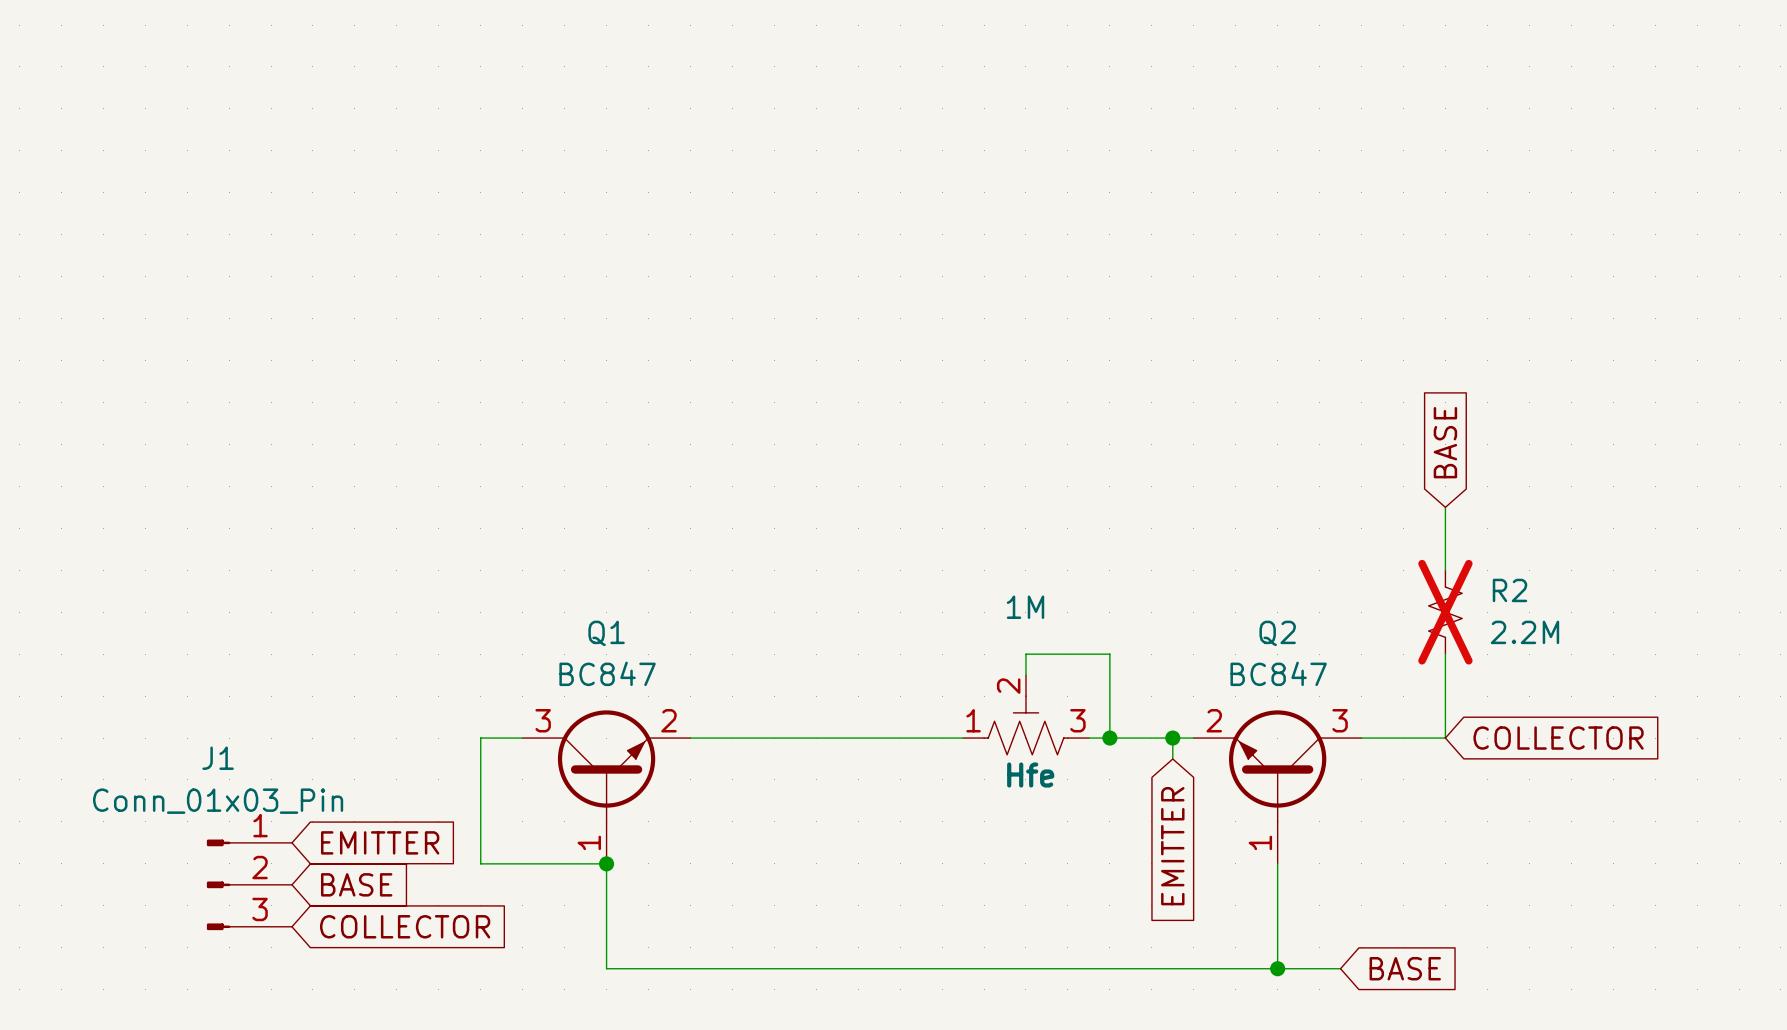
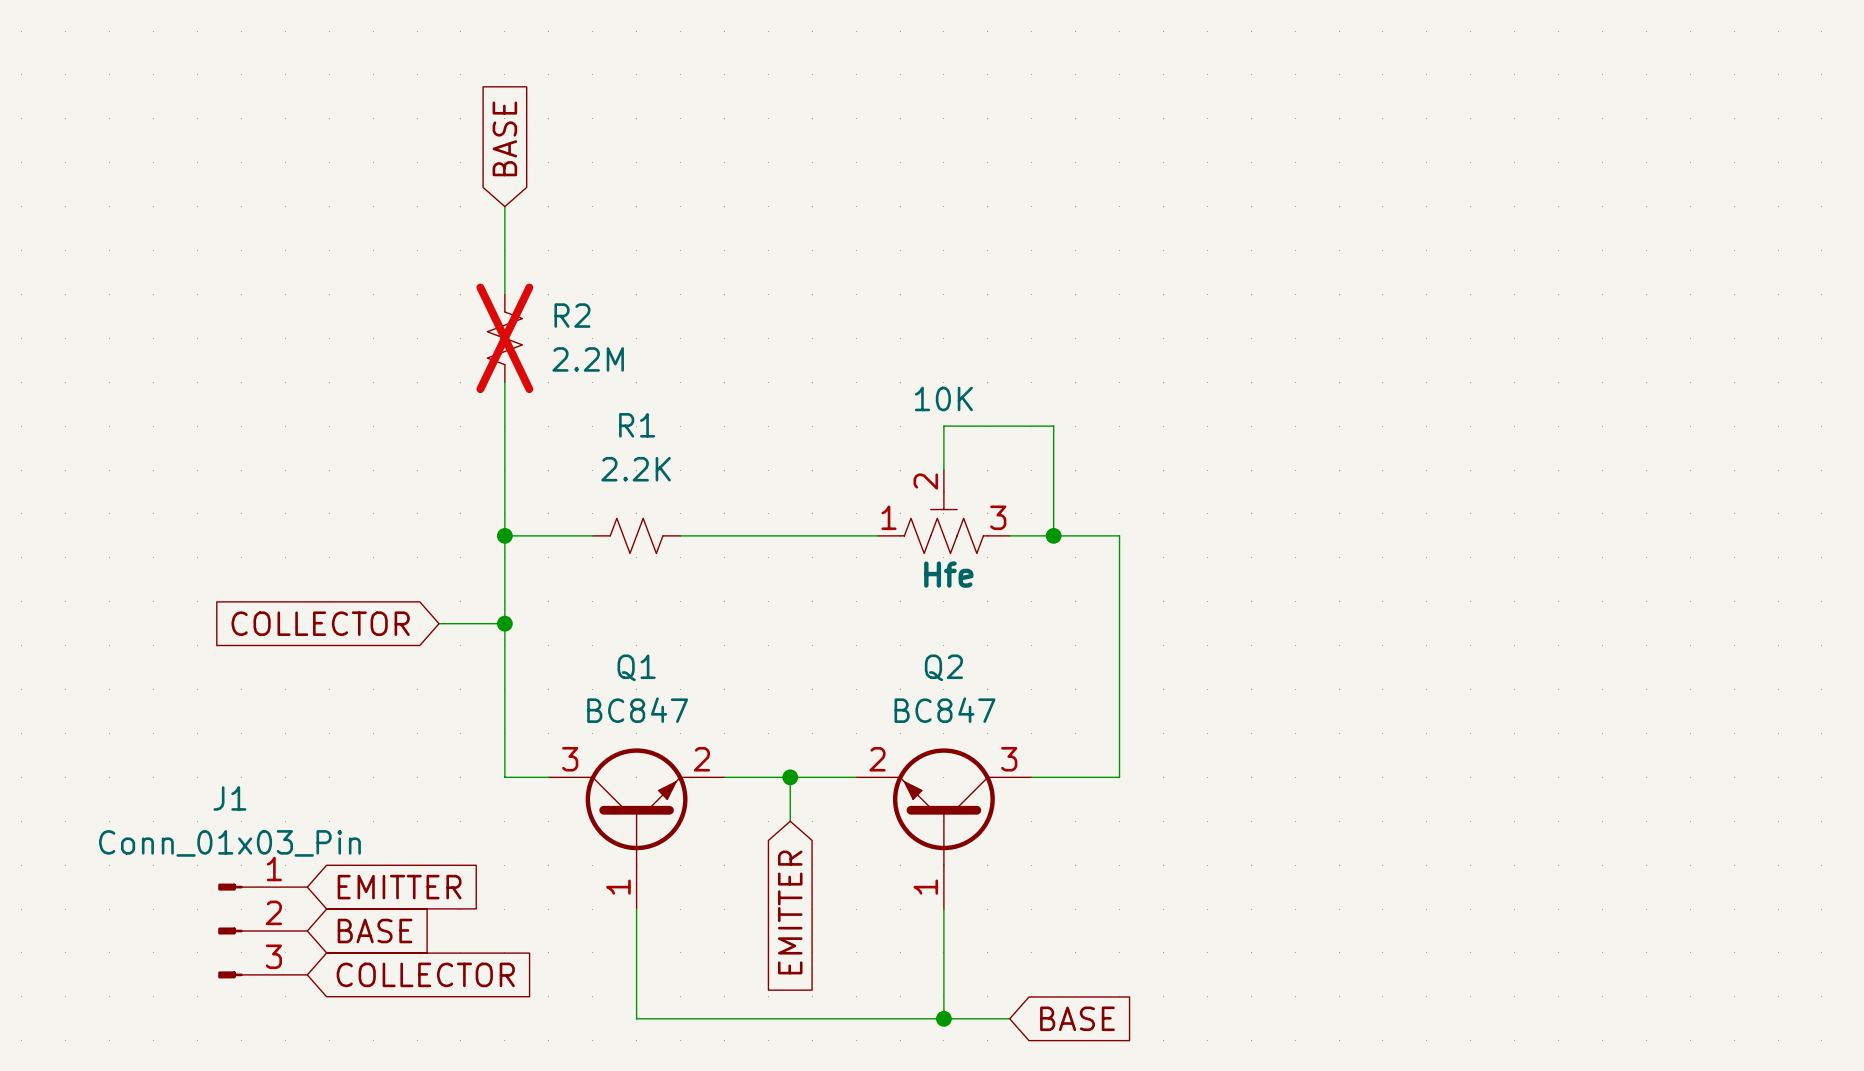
global label: none -> BASE (504, 138)
wire: none -> (504, 206) (504, 294)
global label: BASE (1445, 442) -> none
wire: none -> (943, 470) (943, 426) (1053, 426) (1053, 535)
part: none -> 10K (943, 511)
wire: none -> (504, 535) (592, 535)
junction: none -> (504, 535)
R1: none -> 2.2K (636, 535)
wire: none -> (680, 535) (878, 535)
wire: none -> (1009, 535) (1119, 535) (1119, 777) (1031, 777)
junction: none -> (1053, 535)
wire: (1445, 507) (1445, 570) -> none
global label: none -> COLLECTOR (320, 623)
wire: none -> (439, 623) (504, 623)
junction: none -> (504, 623)
R2 position: (1445, 612) -> (504, 338)
wire: (1445, 654) (1445, 738) (1361, 738) -> none
wire: (1025, 675) (1025, 654) (1109, 654) (1109, 738) -> none
part: 1M (1025, 714) -> none
wire: (480, 738) (480, 863) (606, 863) -> (504, 777) (504, 382)
wire: none -> (790, 777) (790, 821)
junction: none -> (790, 777)
wire: (816, 738) (963, 738) -> none
wire: (1088, 738) (1193, 738) -> none
junction: (1109, 738) -> none
wire: (1172, 738) (1172, 759) -> none
junction: (1172, 738) -> none
global label: COLLECTOR (1558, 738) -> none
Q2 position: (1277, 787) -> (943, 828)
global label: EMITTER (1172, 846) -> none
junction: (606, 863) -> none
wire: (1277, 863) (1277, 968) -> (943, 909) (943, 1018)
global label: none -> EMITTER (790, 912)
junction: none -> (943, 1018)
wire: (963, 968) (1340, 968) -> none
global label: none -> BASE (1077, 1018)
junction: (1277, 968) -> none
global label: BASE (1405, 968) -> none

